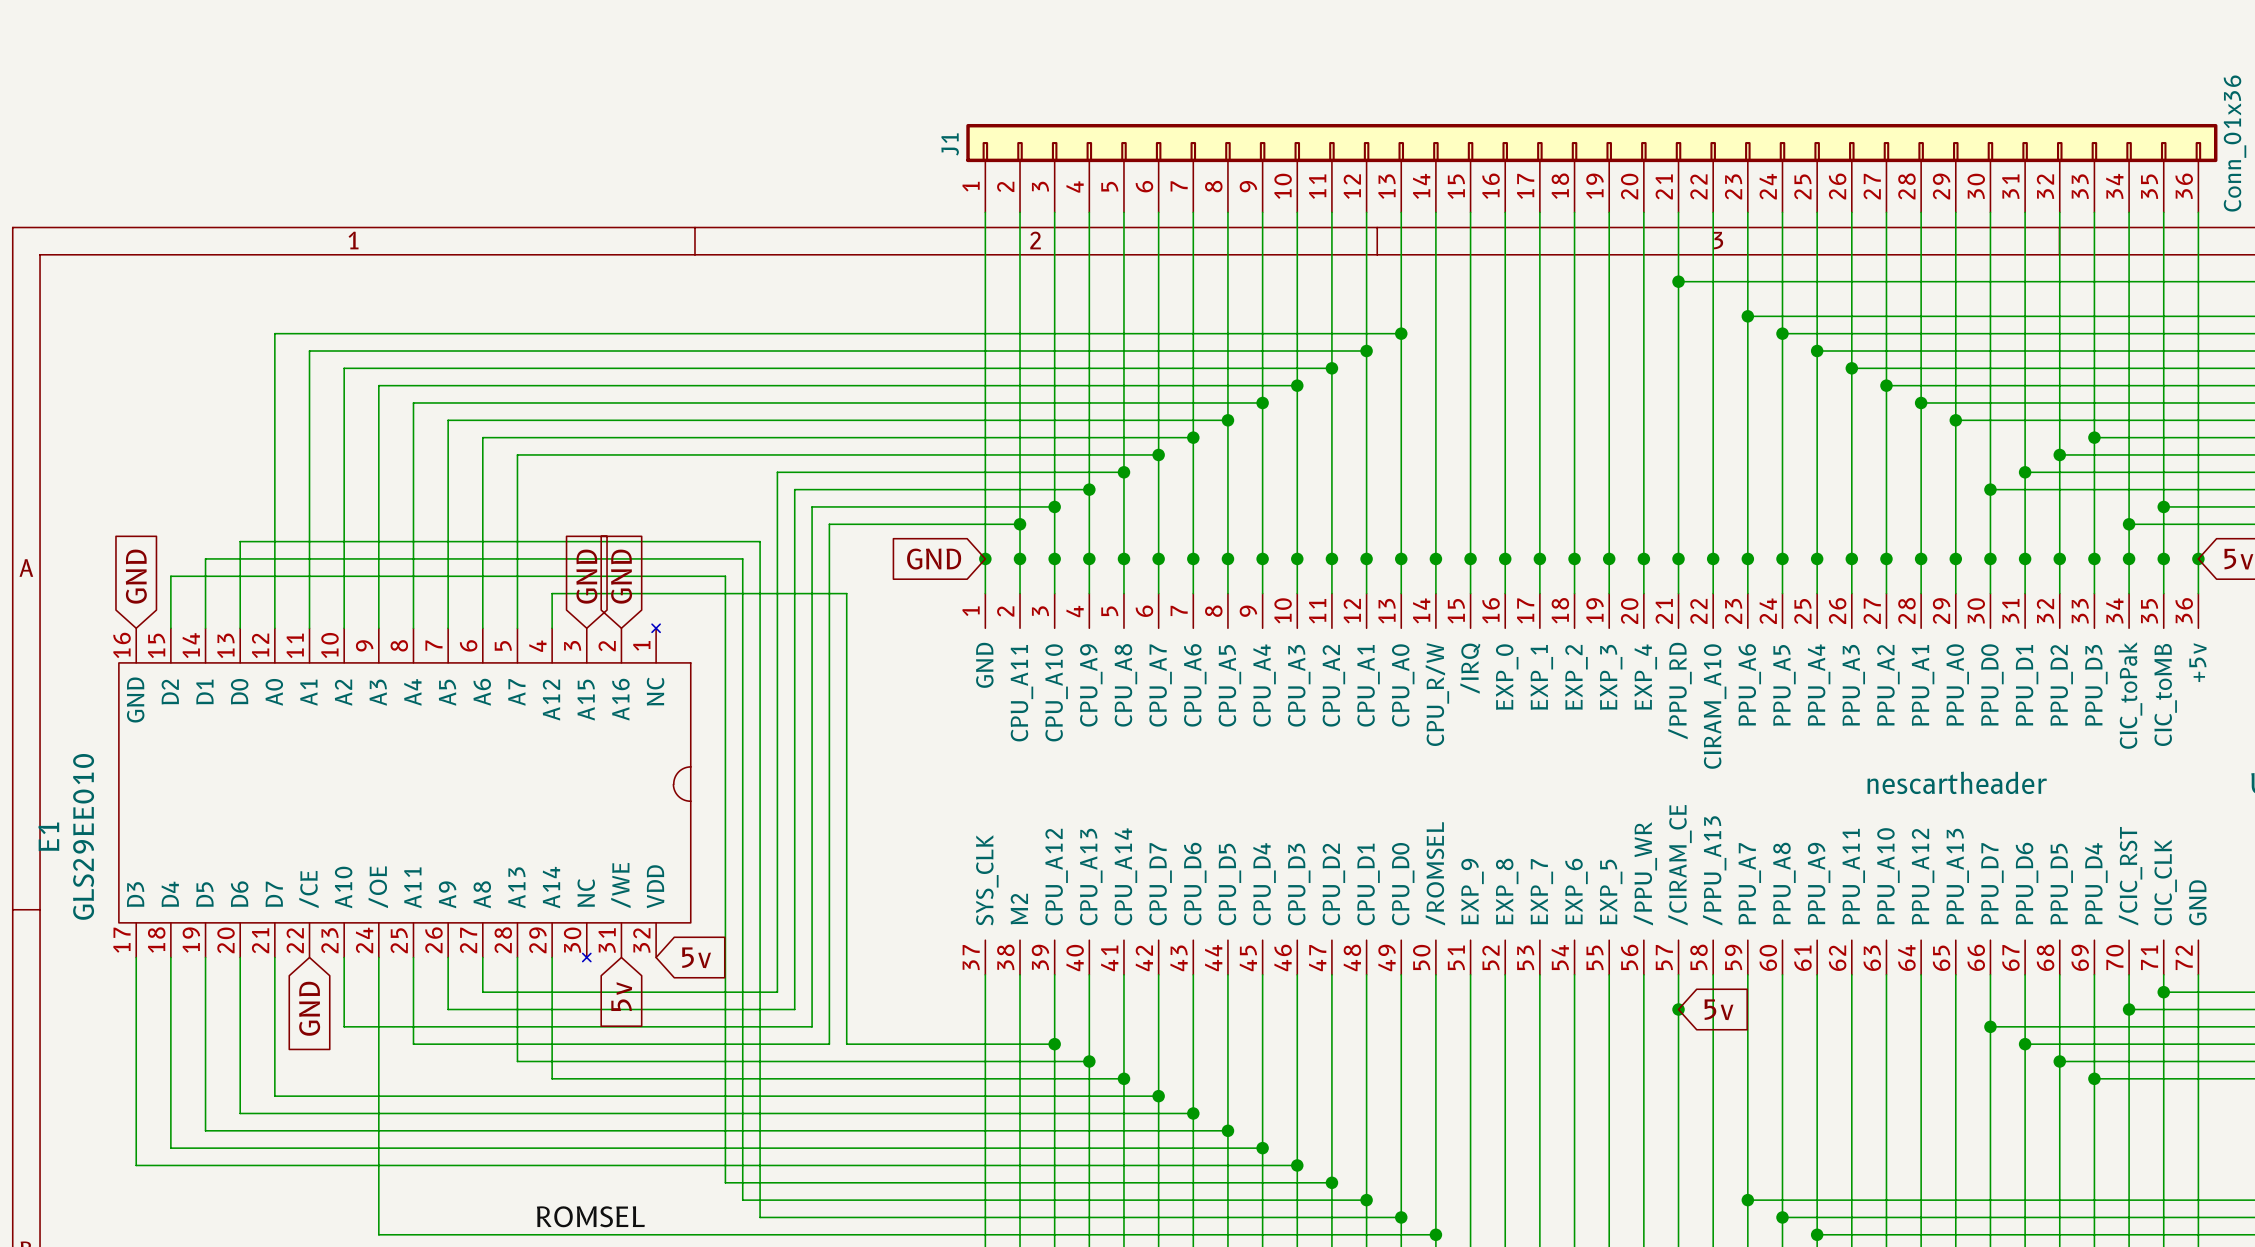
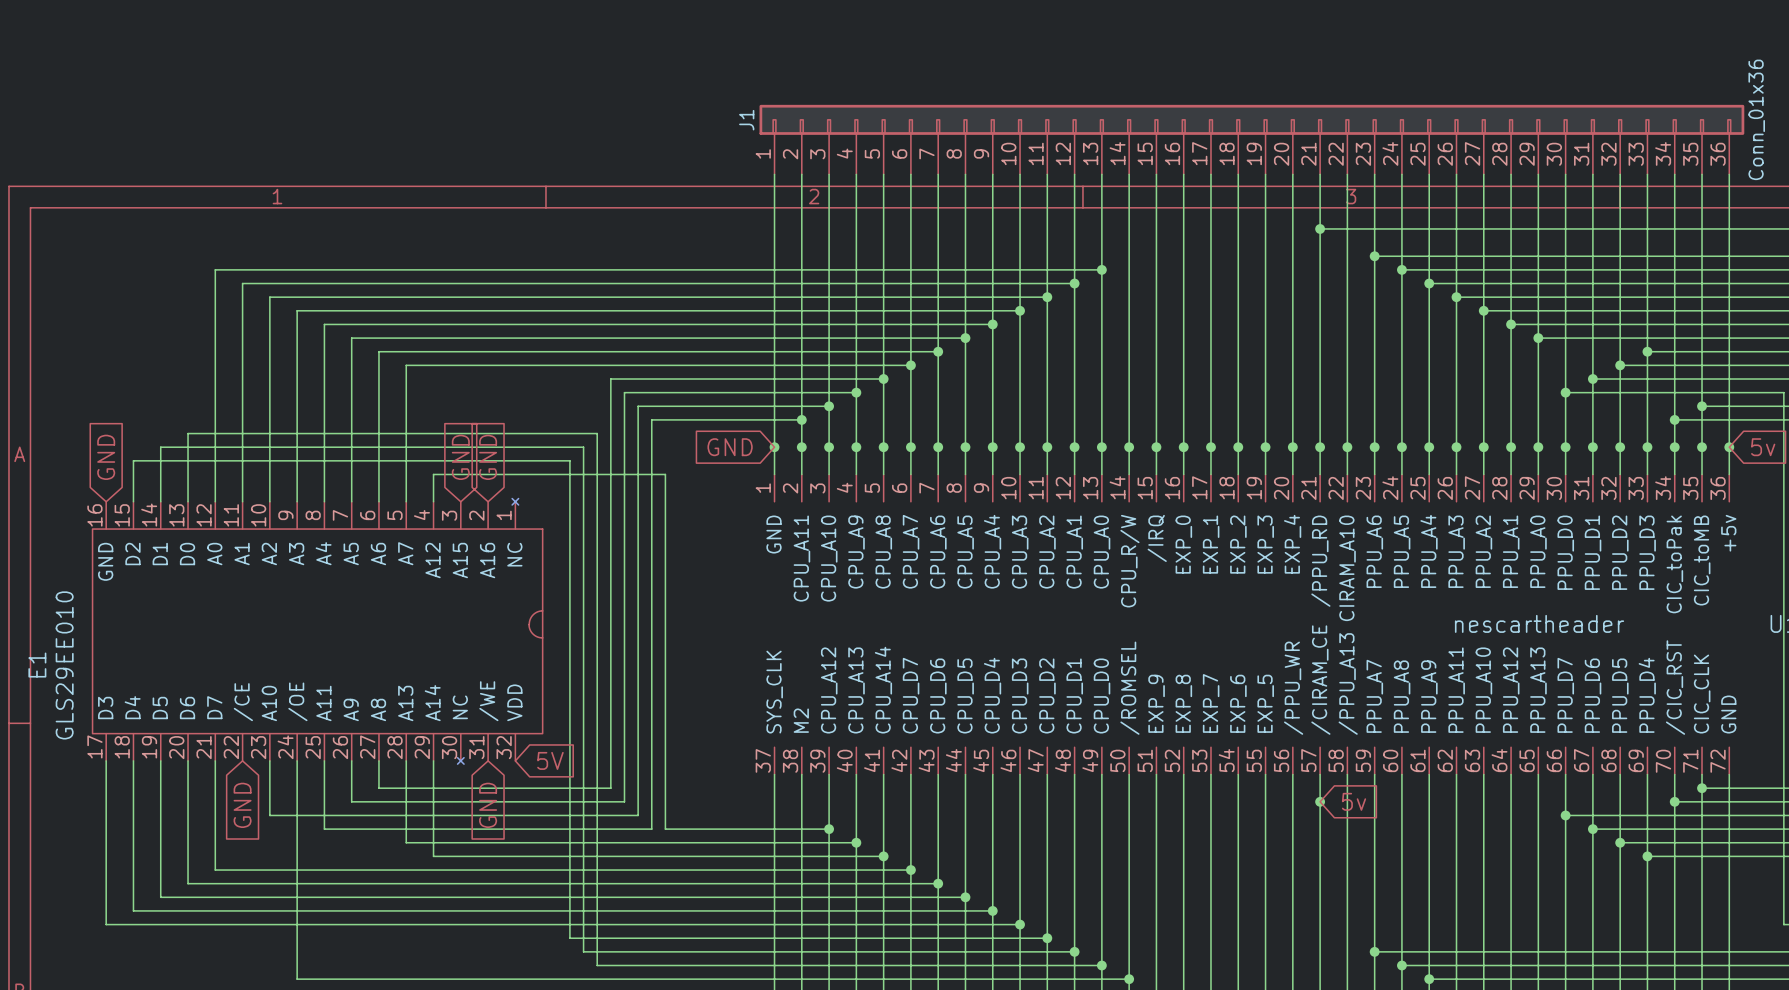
global label: 5v (696, 957) -> 5V (550, 760)
global label: 5v (621, 996) -> GND (488, 805)
label: ROMSEL (590, 1216) -> none

